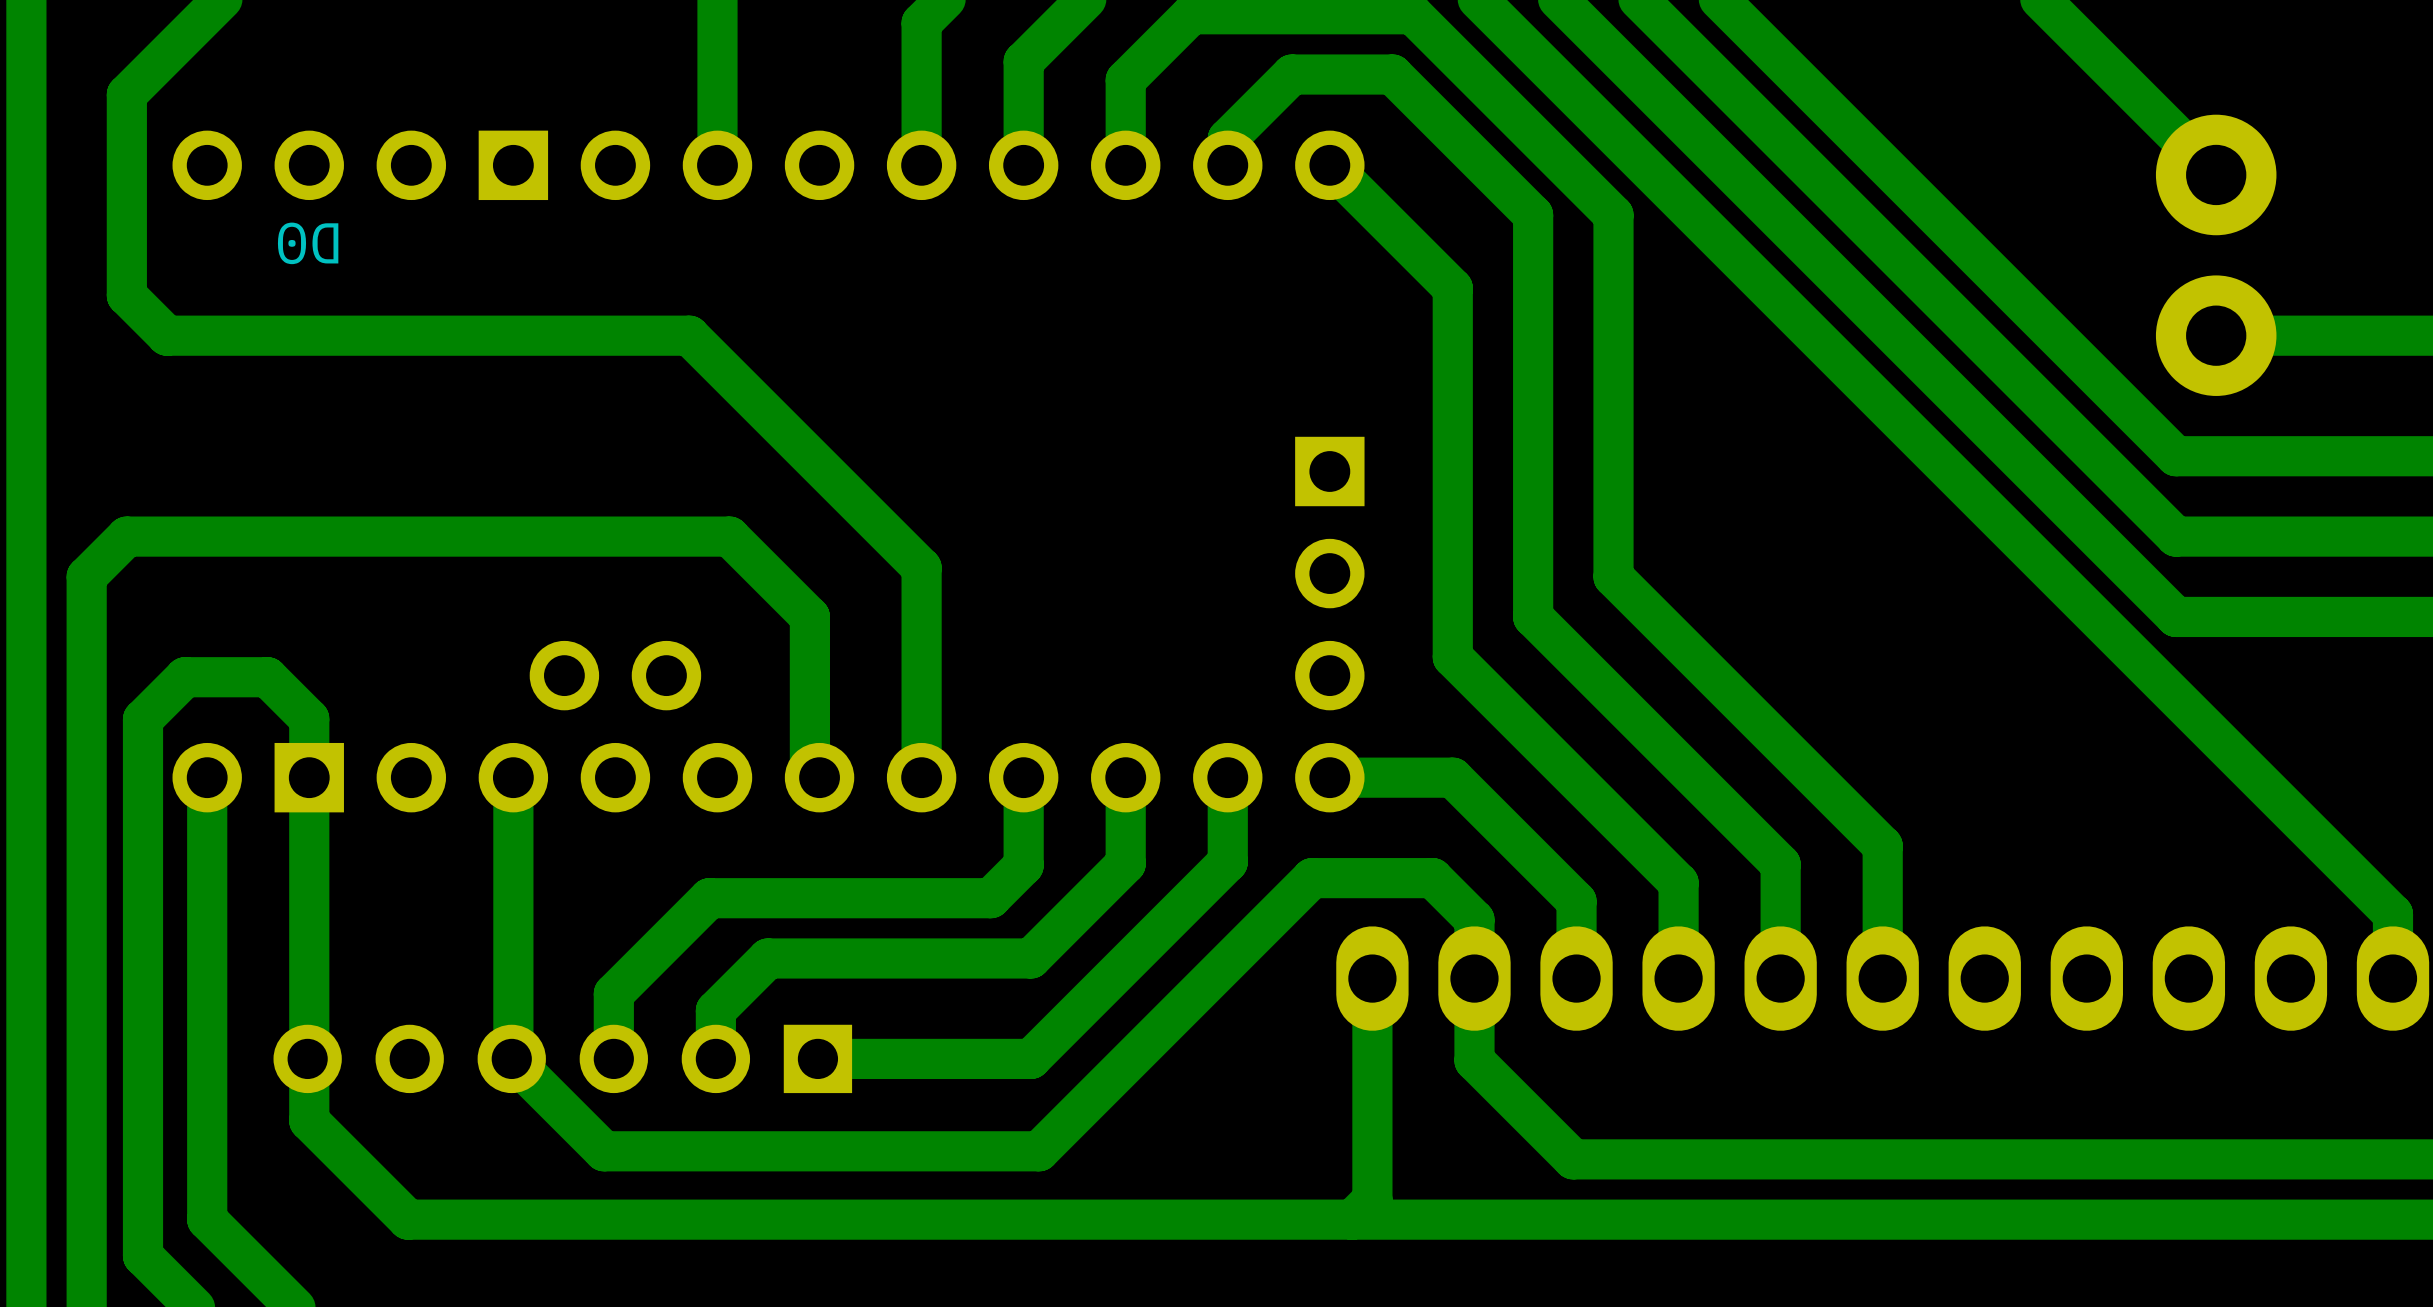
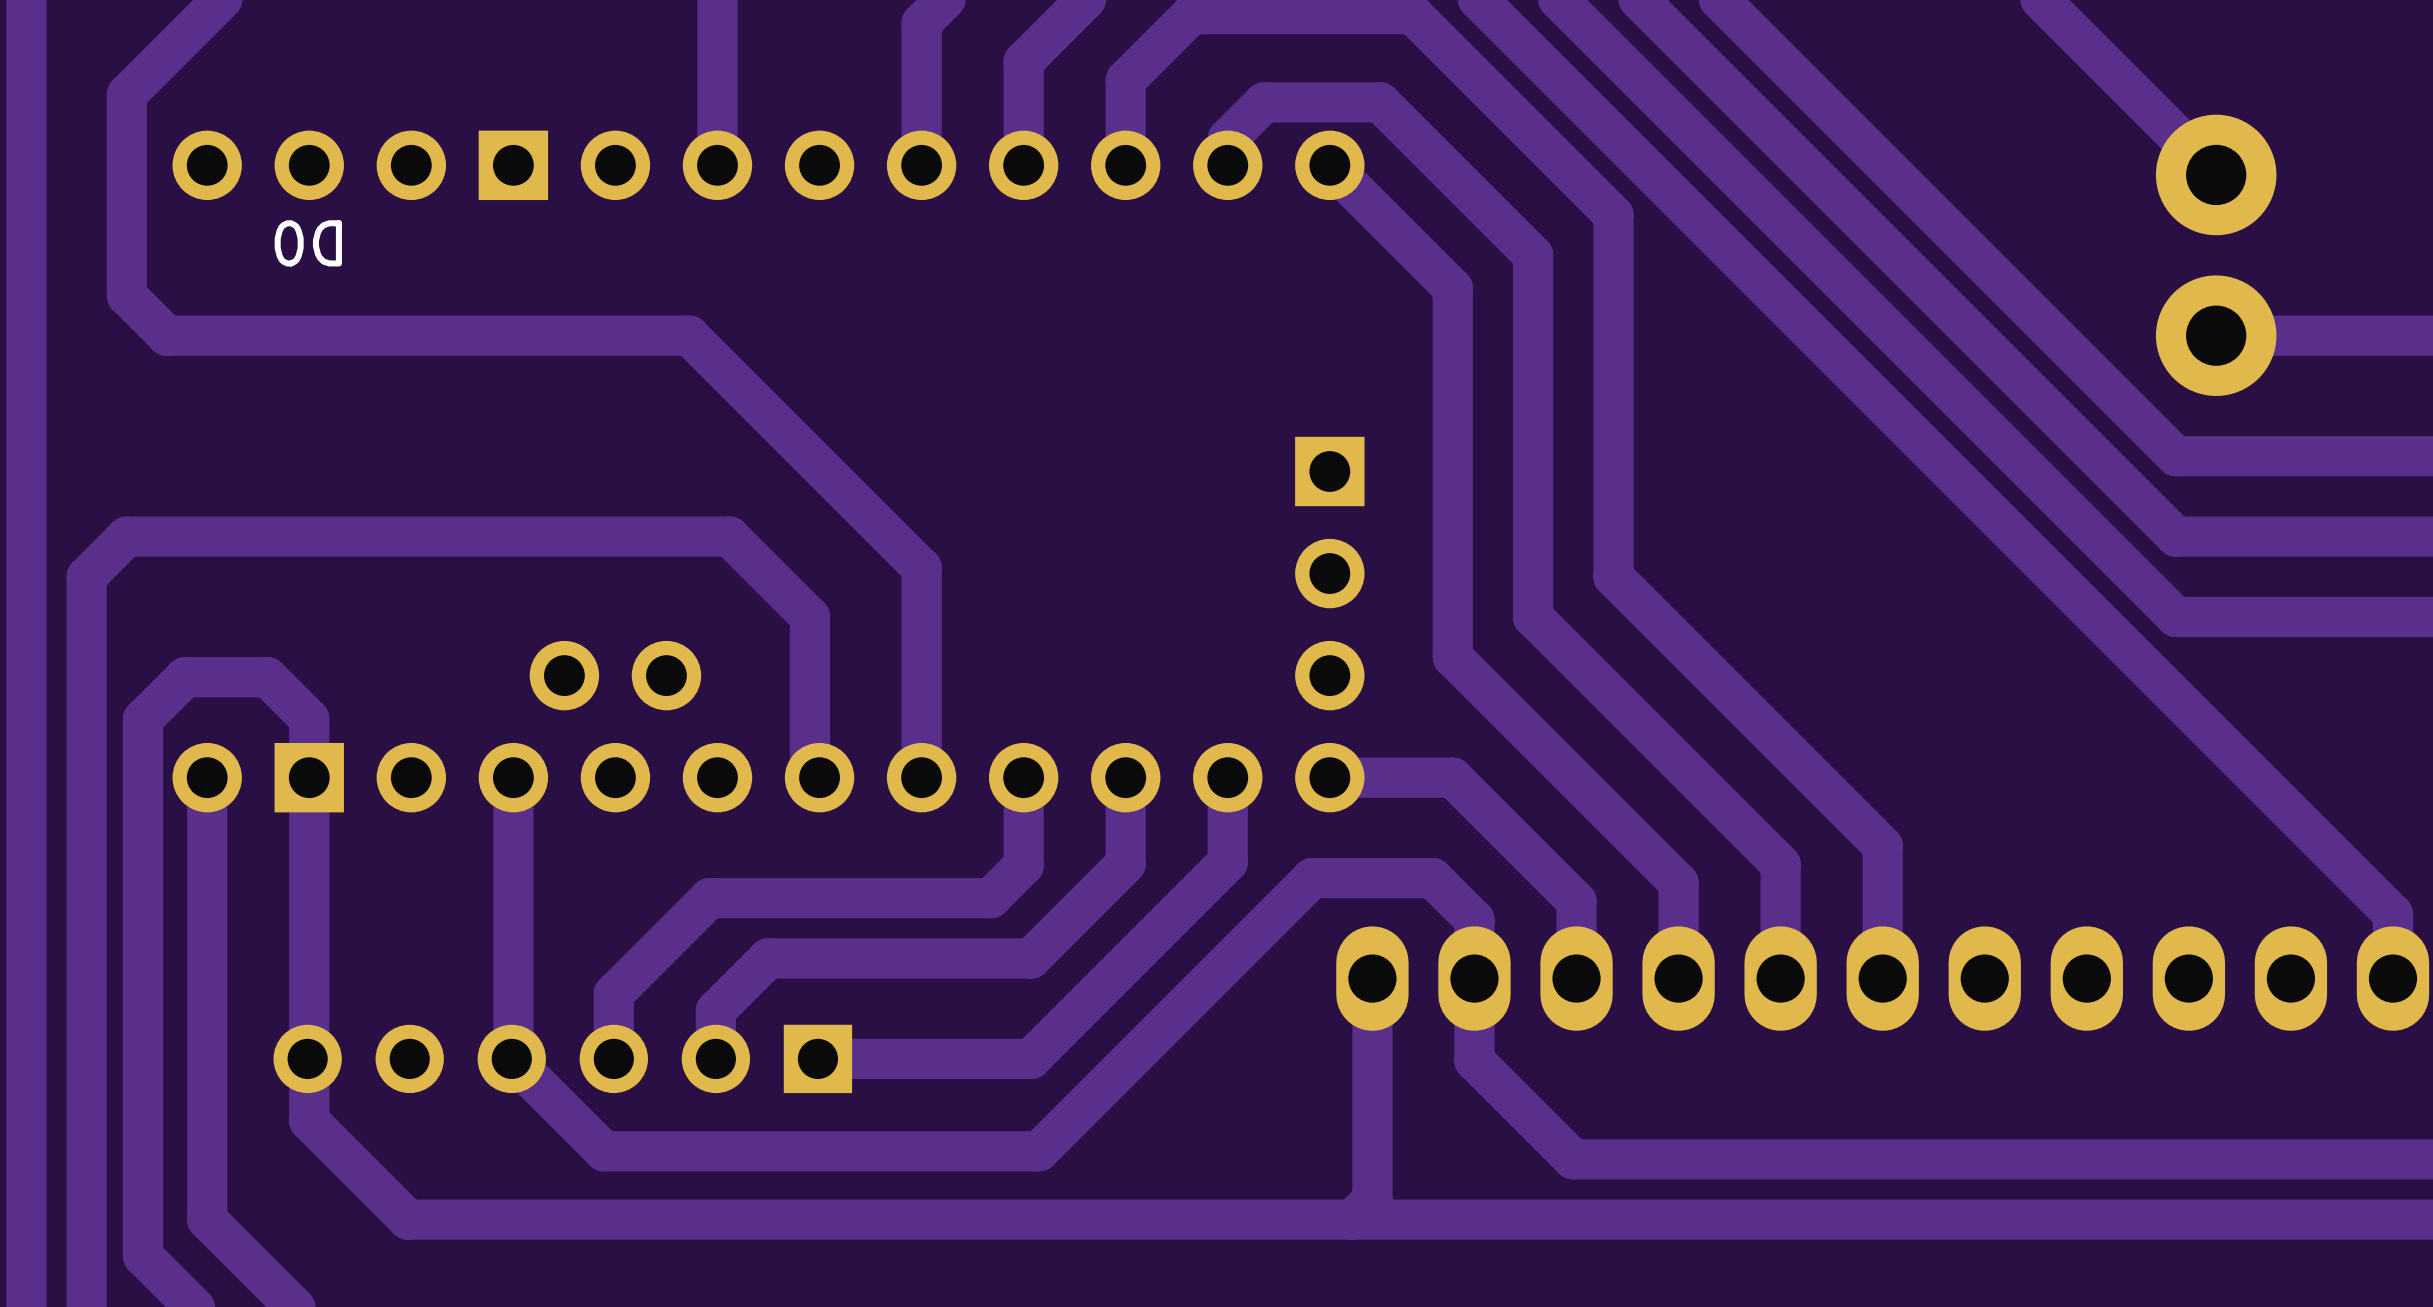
track: (1264, 102) (1292, 74) (1392, 74) (1533, 215) (1533, 255) -> (1264, 102) (1380, 102) (1533, 255)

